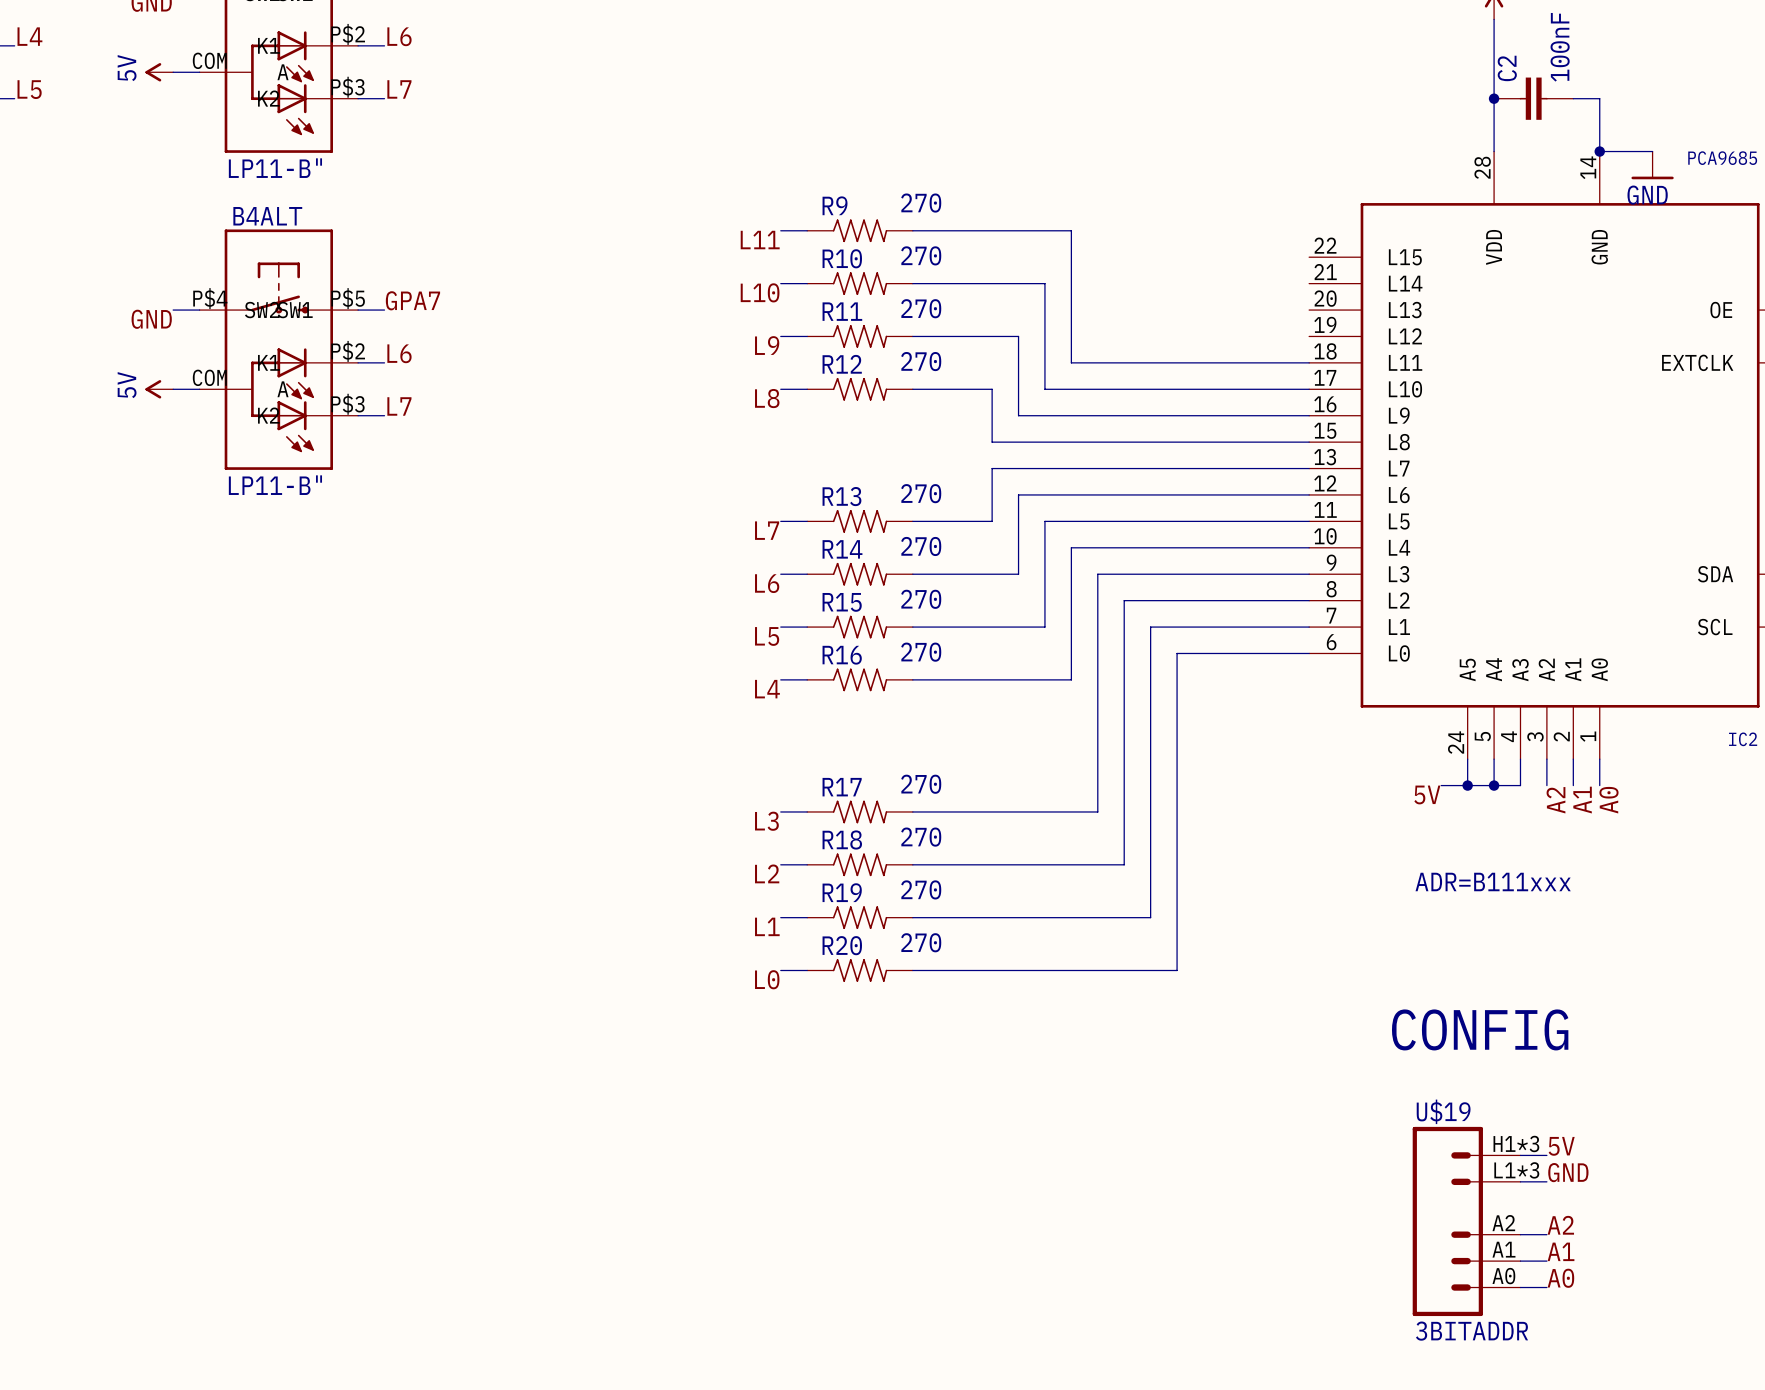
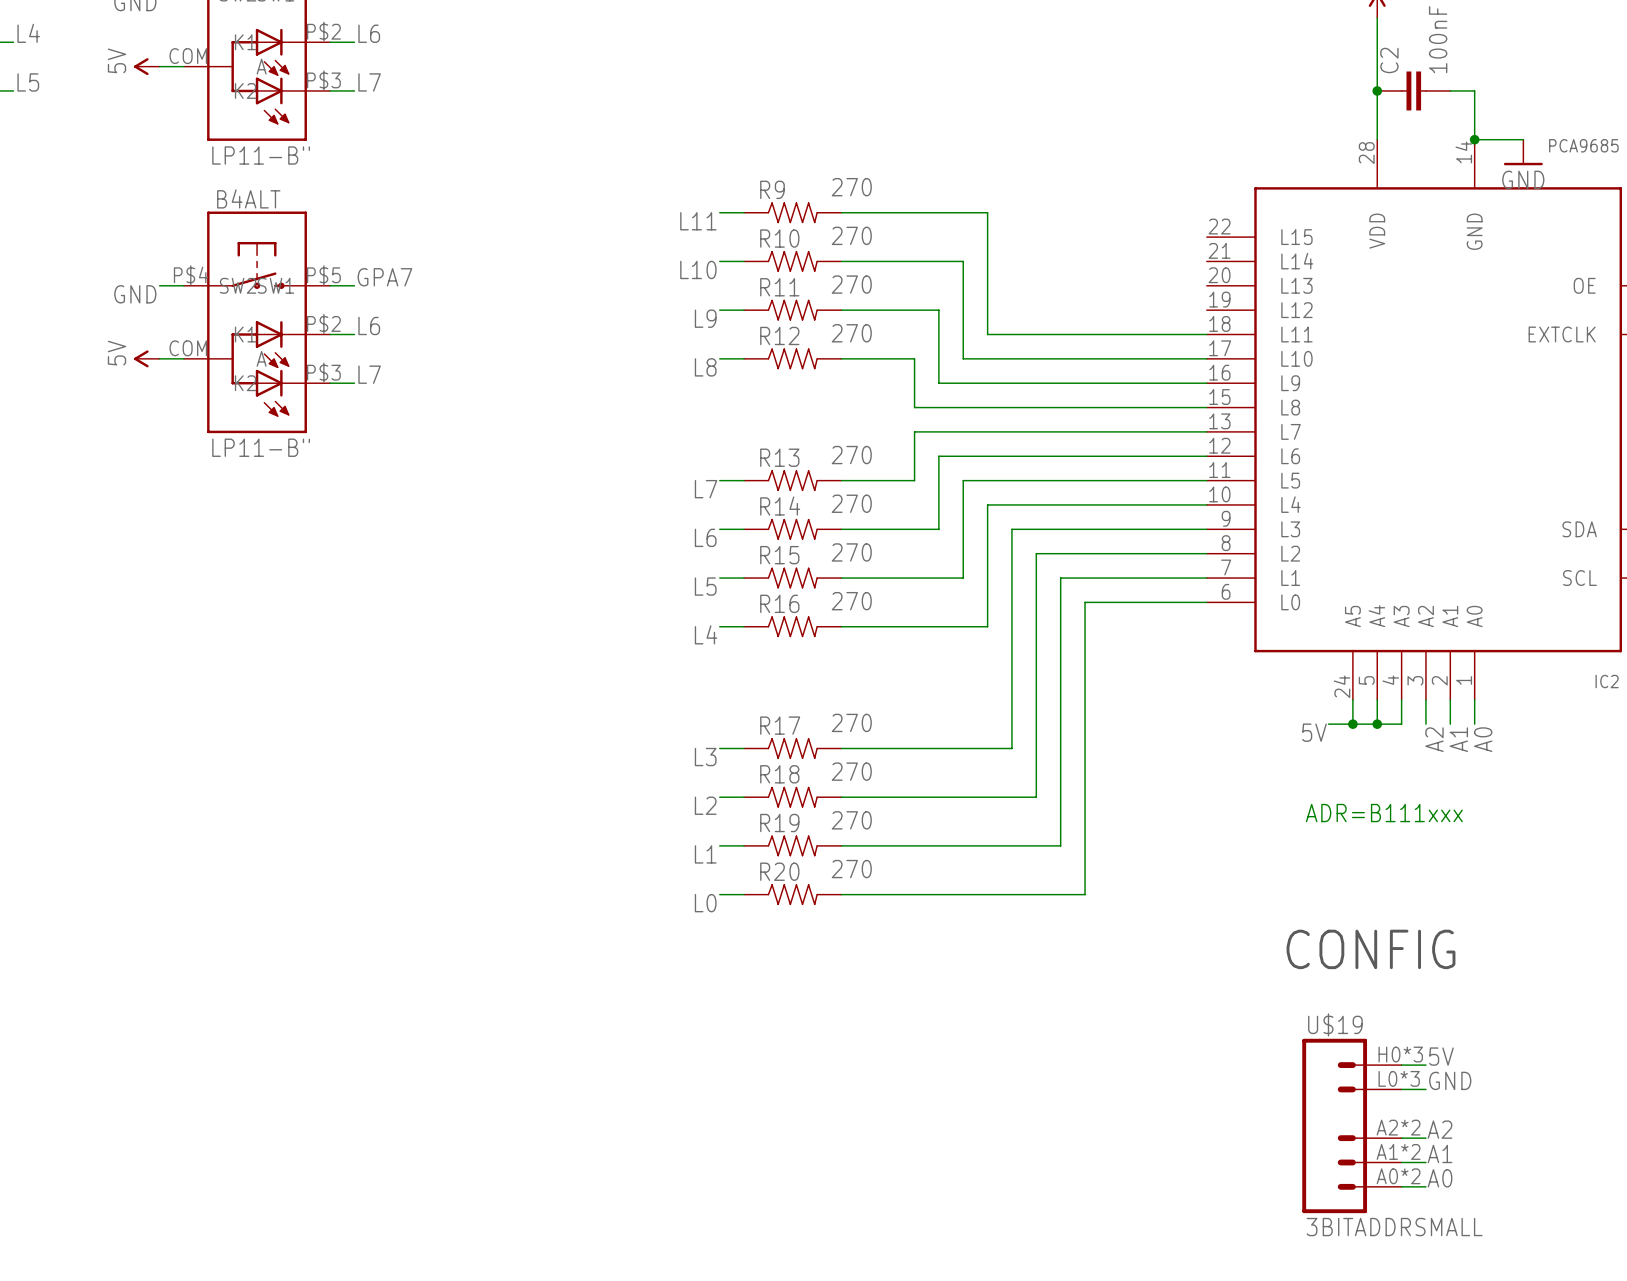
U$19 pin number: H1*3 (1516, 1143) -> H0*3 (1400, 1054)
U$19 pin number: L1*3 (1516, 1170) -> L0*3 (1399, 1078)
U$19 pin number: A2 (1503, 1223) -> A2*2 (1398, 1127)
U$19 pin number: A1 (1503, 1249) -> A1*2 (1398, 1151)
U$19 pin number: A0 (1503, 1276) -> A0*2 (1398, 1176)
U$19 value: 3BITADDR (1472, 1331) -> 3BITADDRSMALL (1394, 1227)

